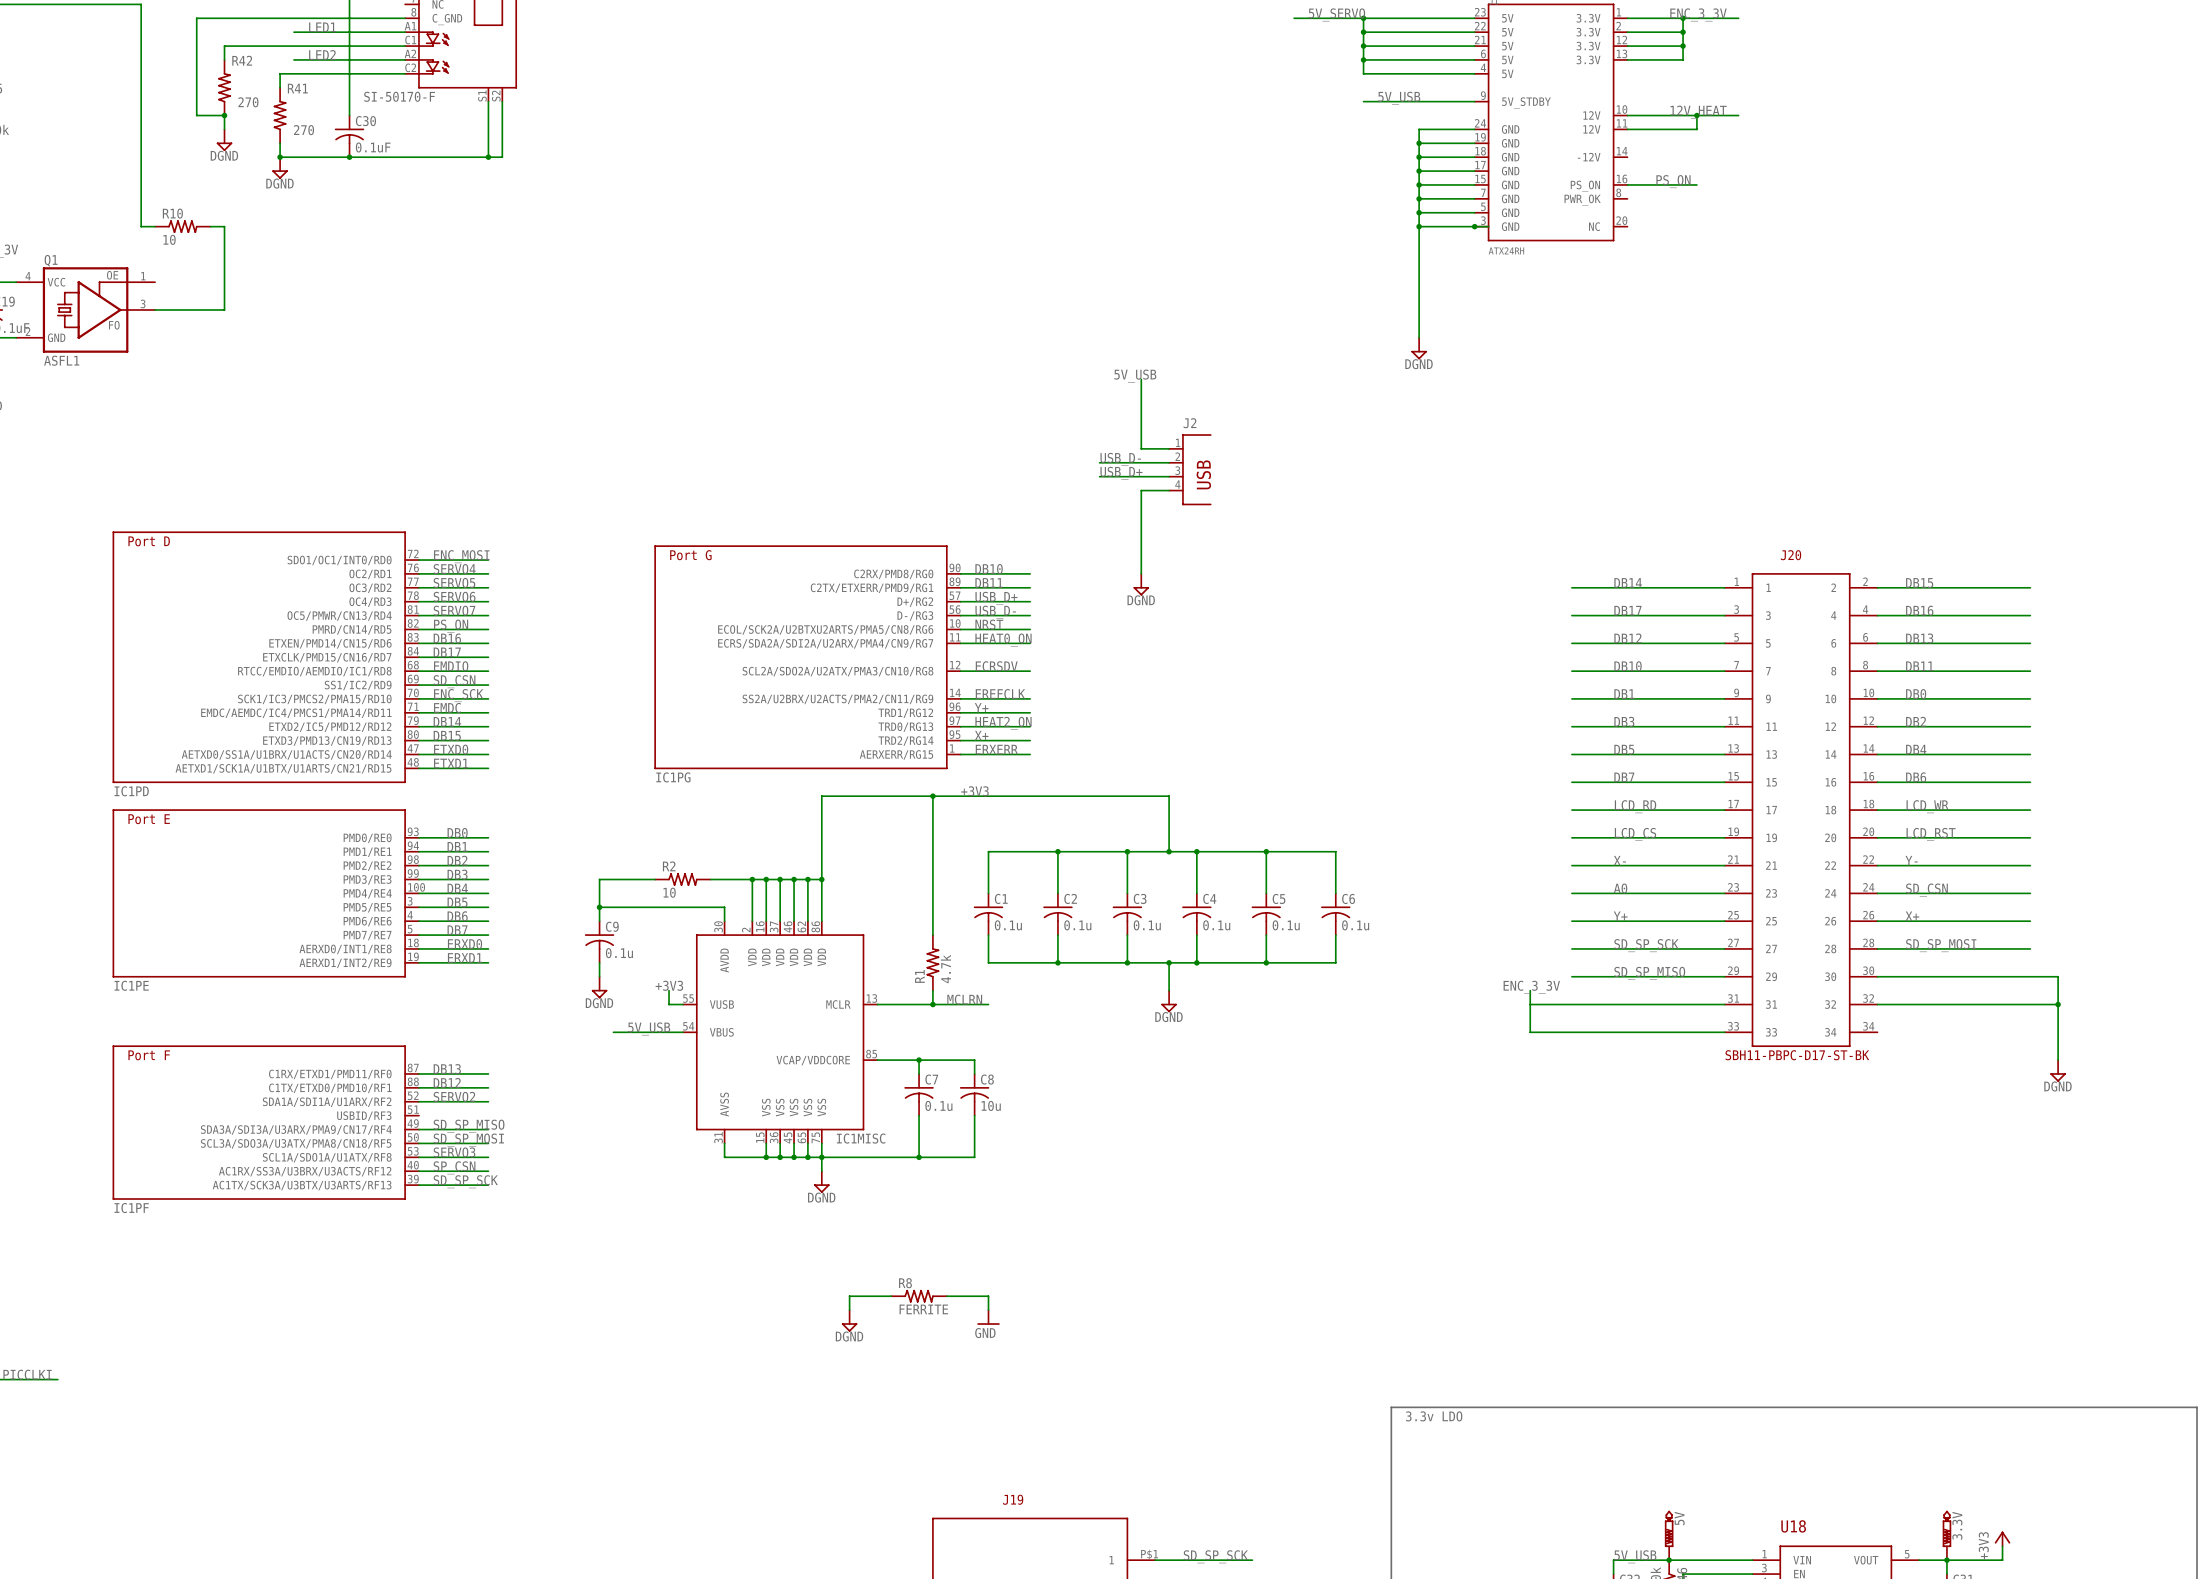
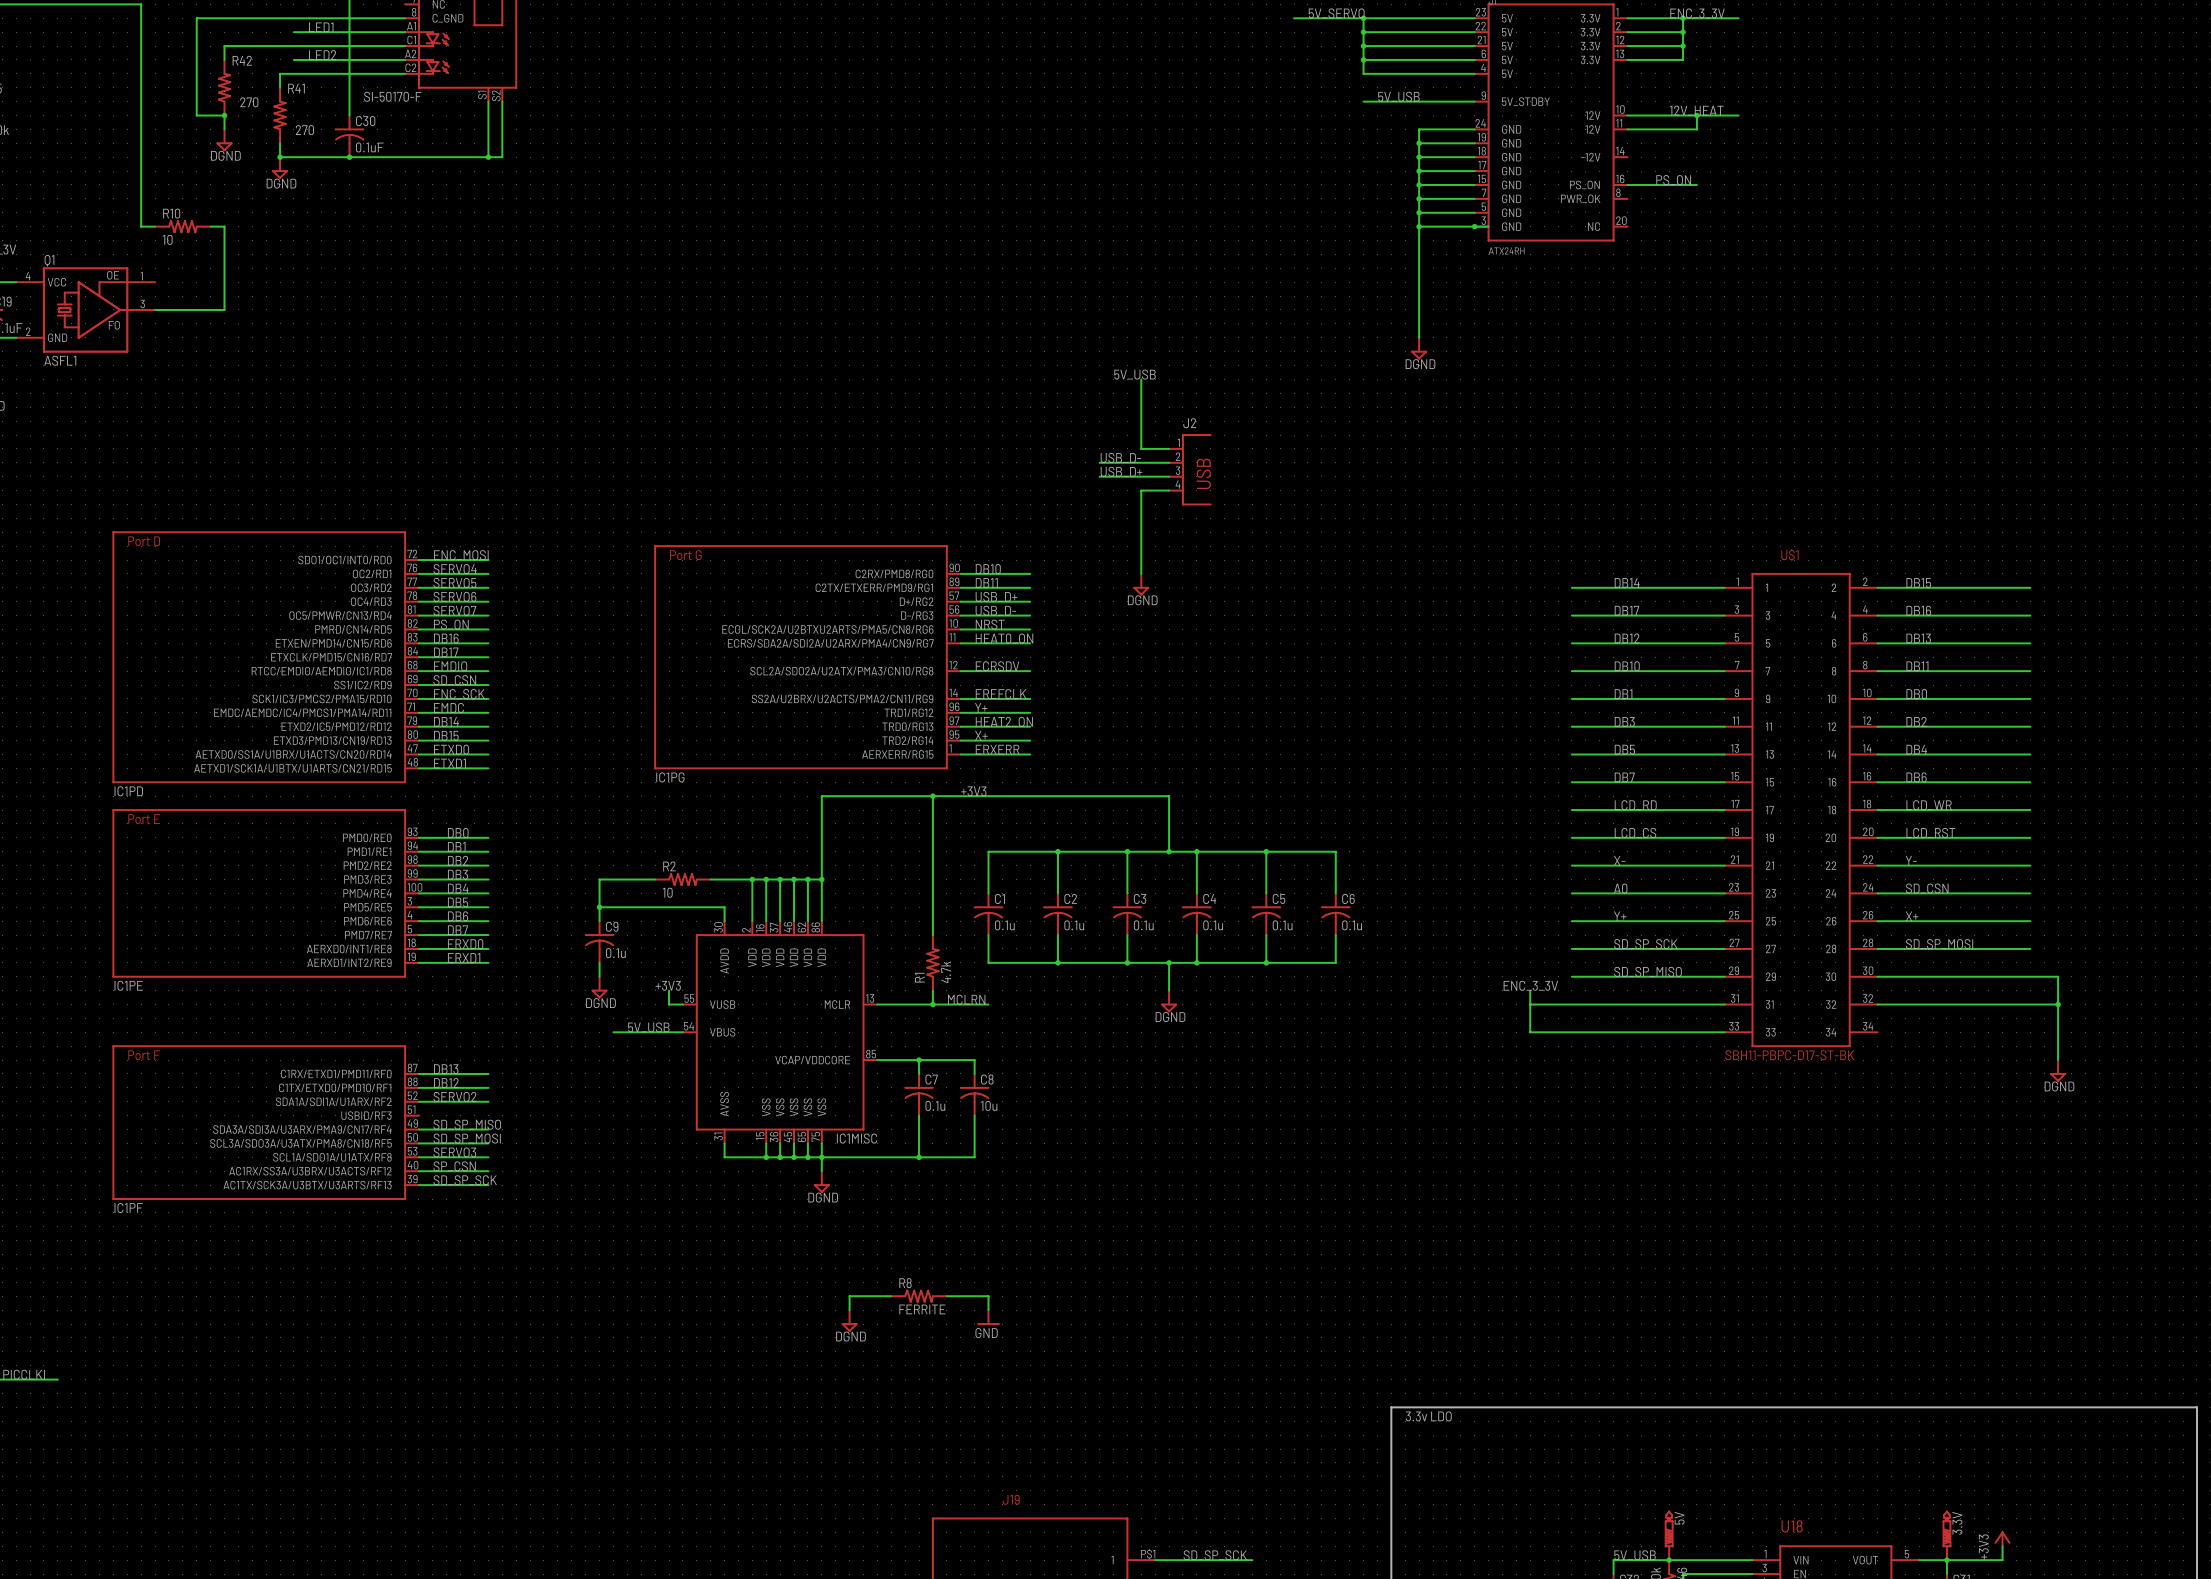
J20 name: J20 (1791, 555) -> U$1 (1789, 555)

